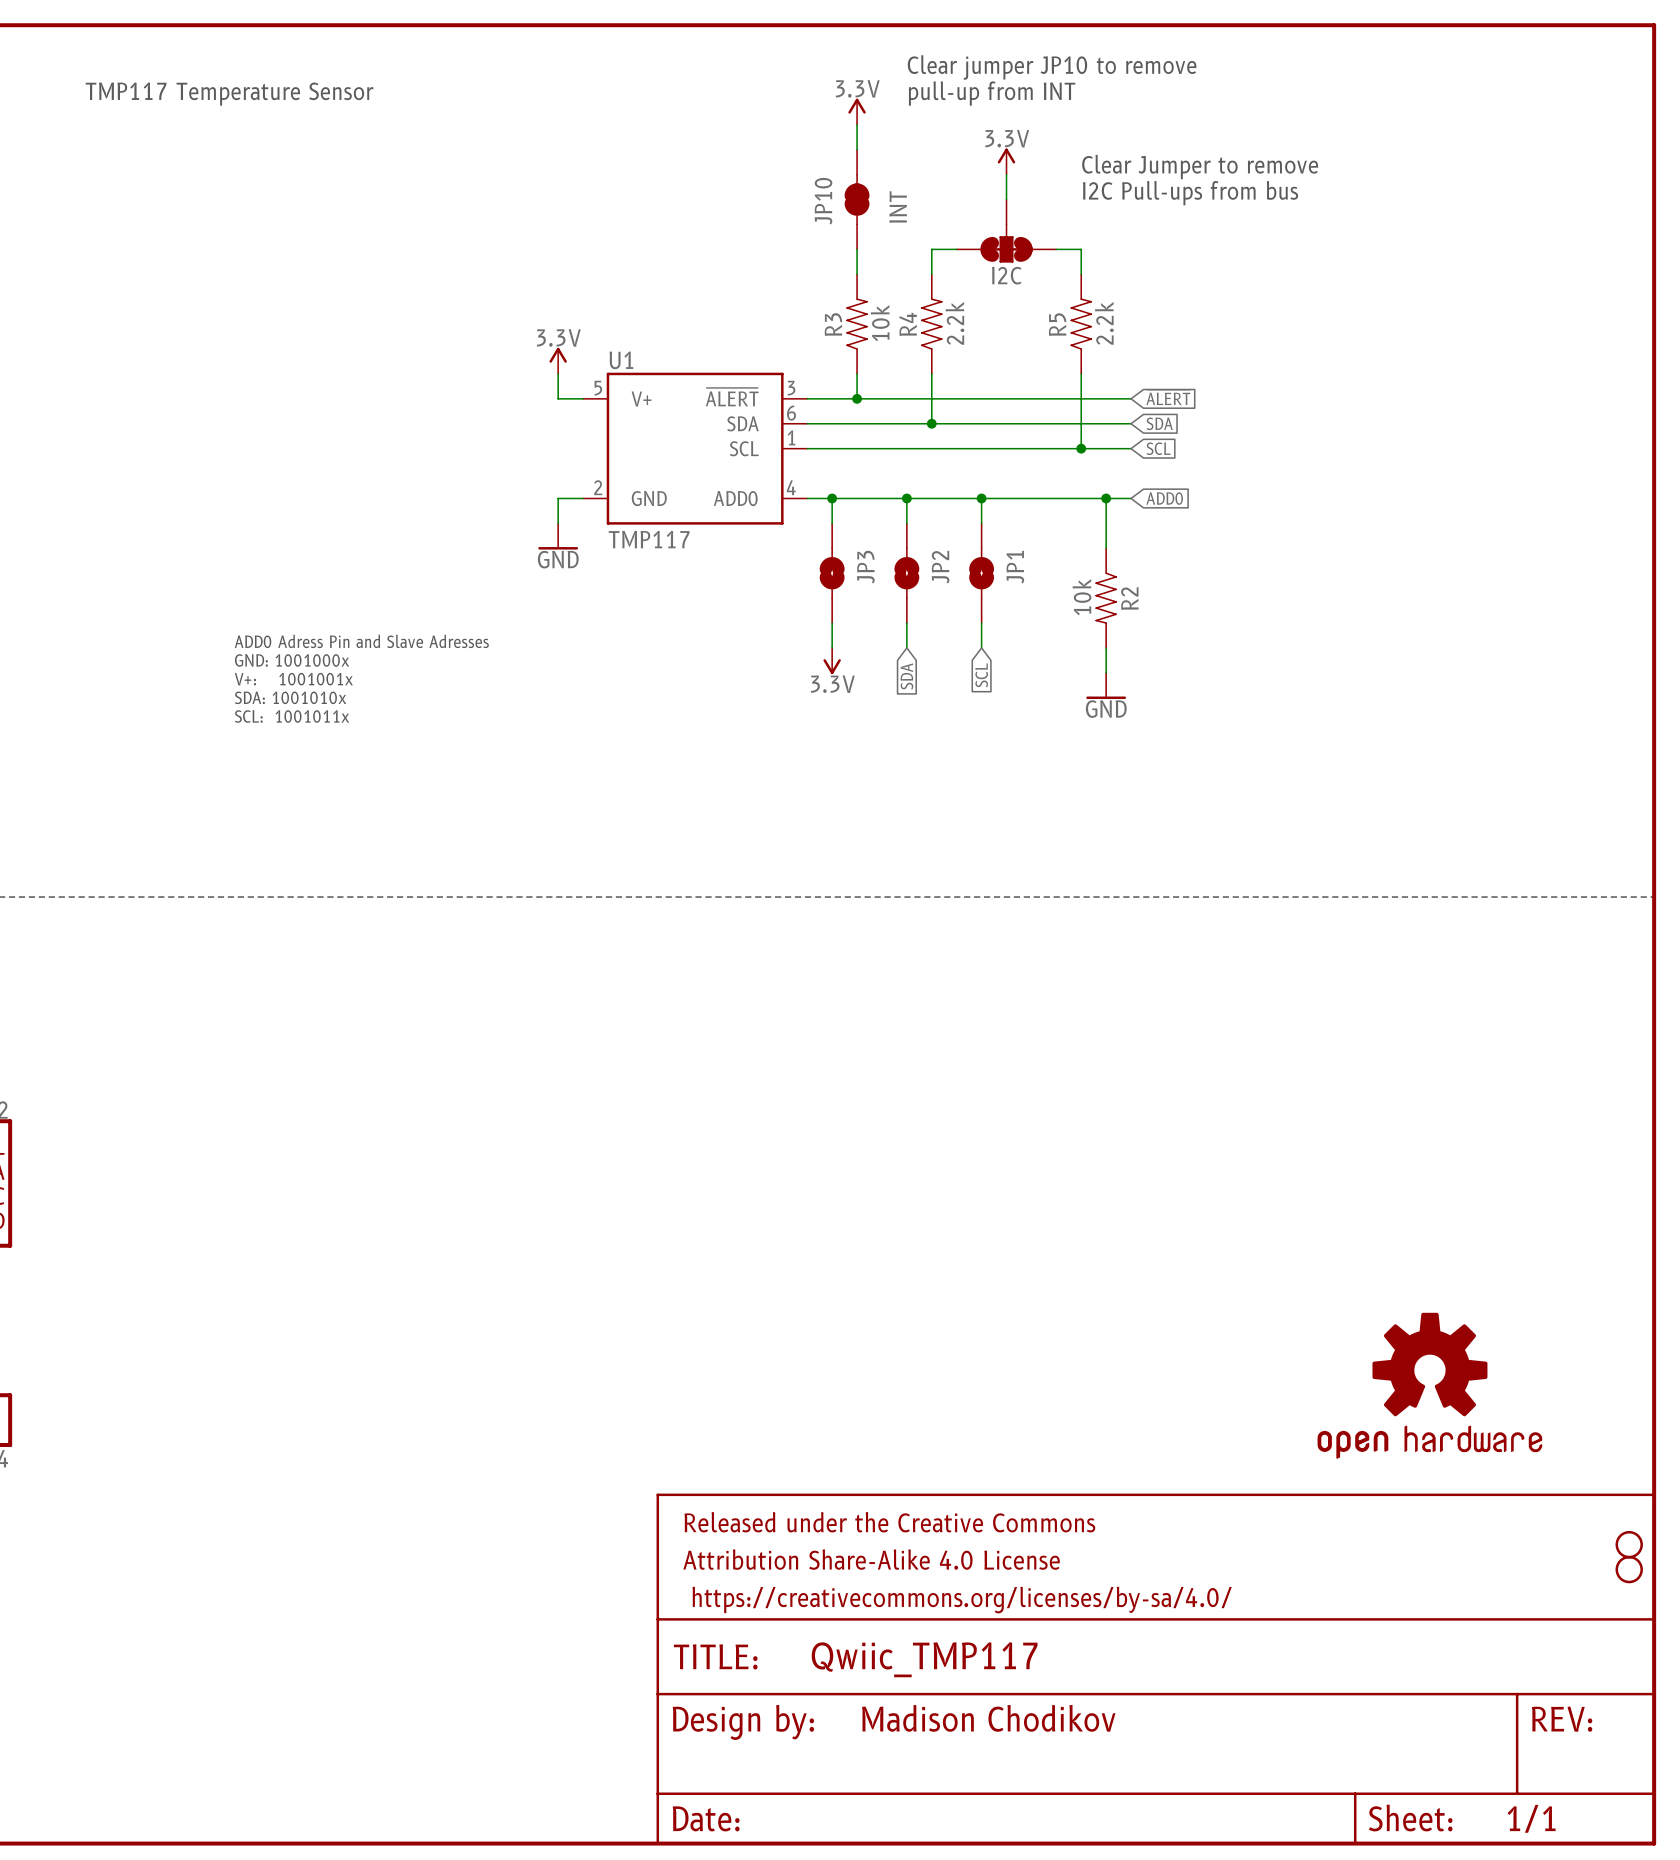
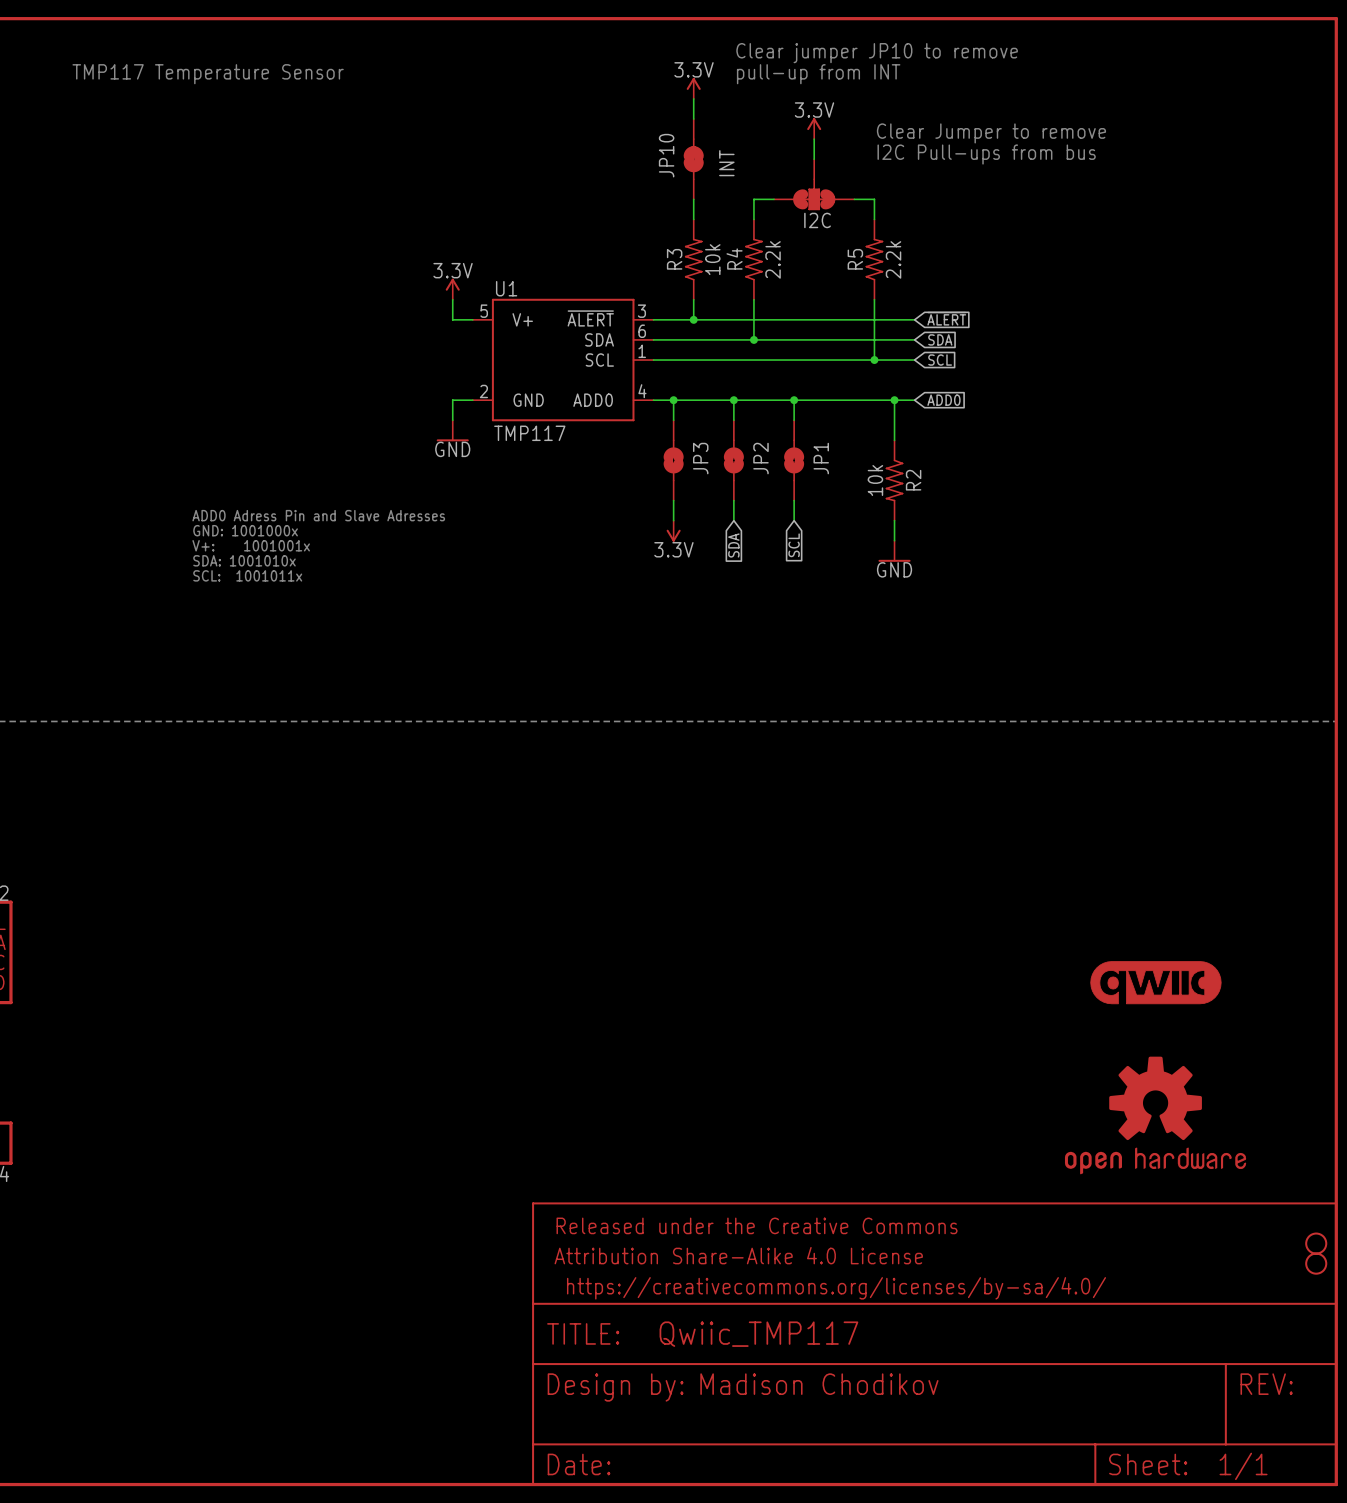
part: none -> (1155, 982)

